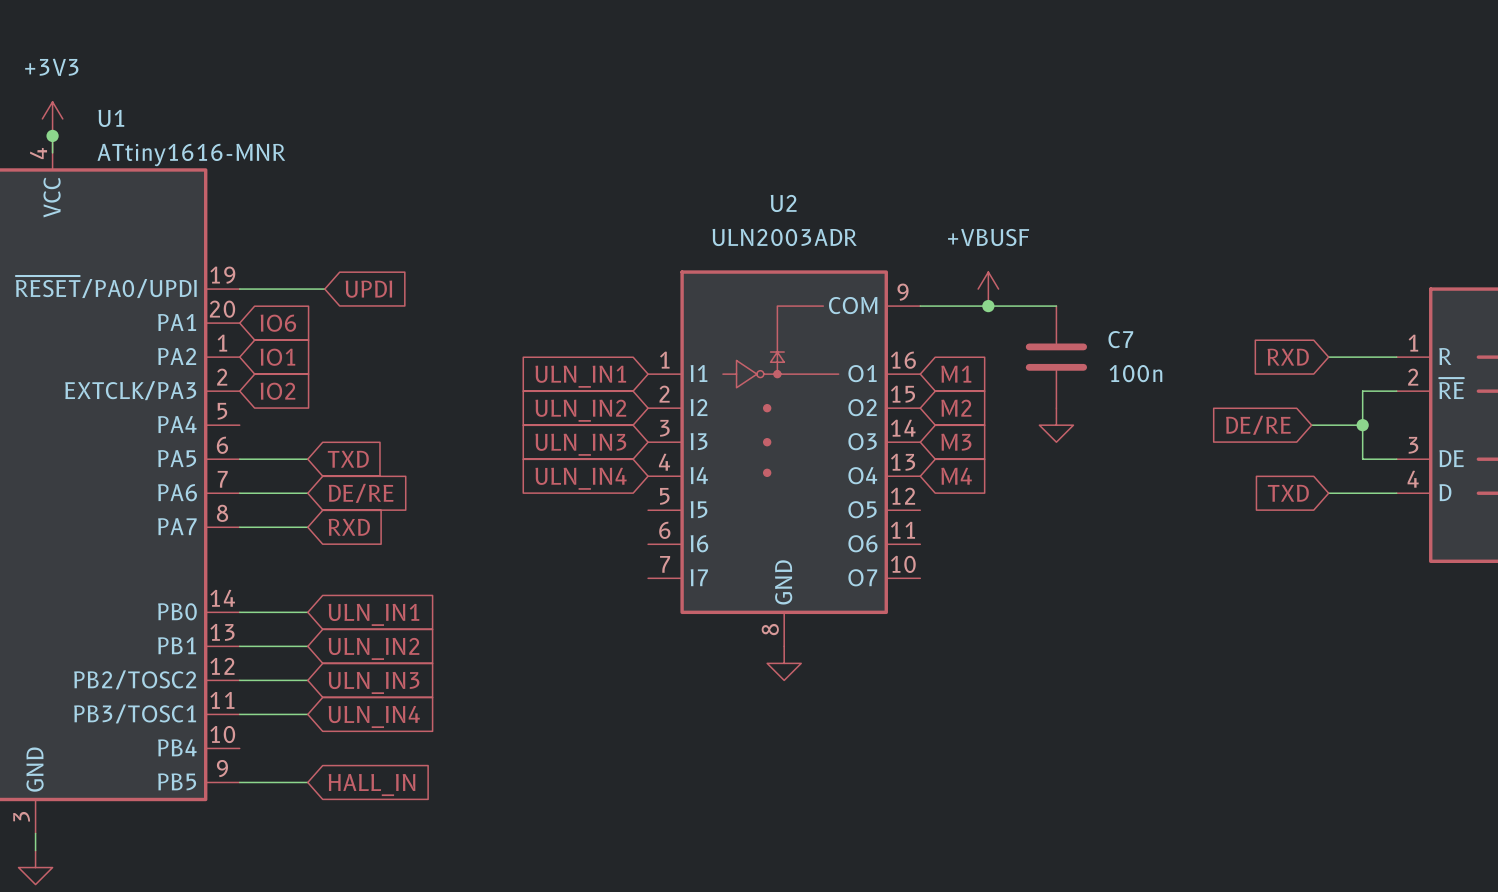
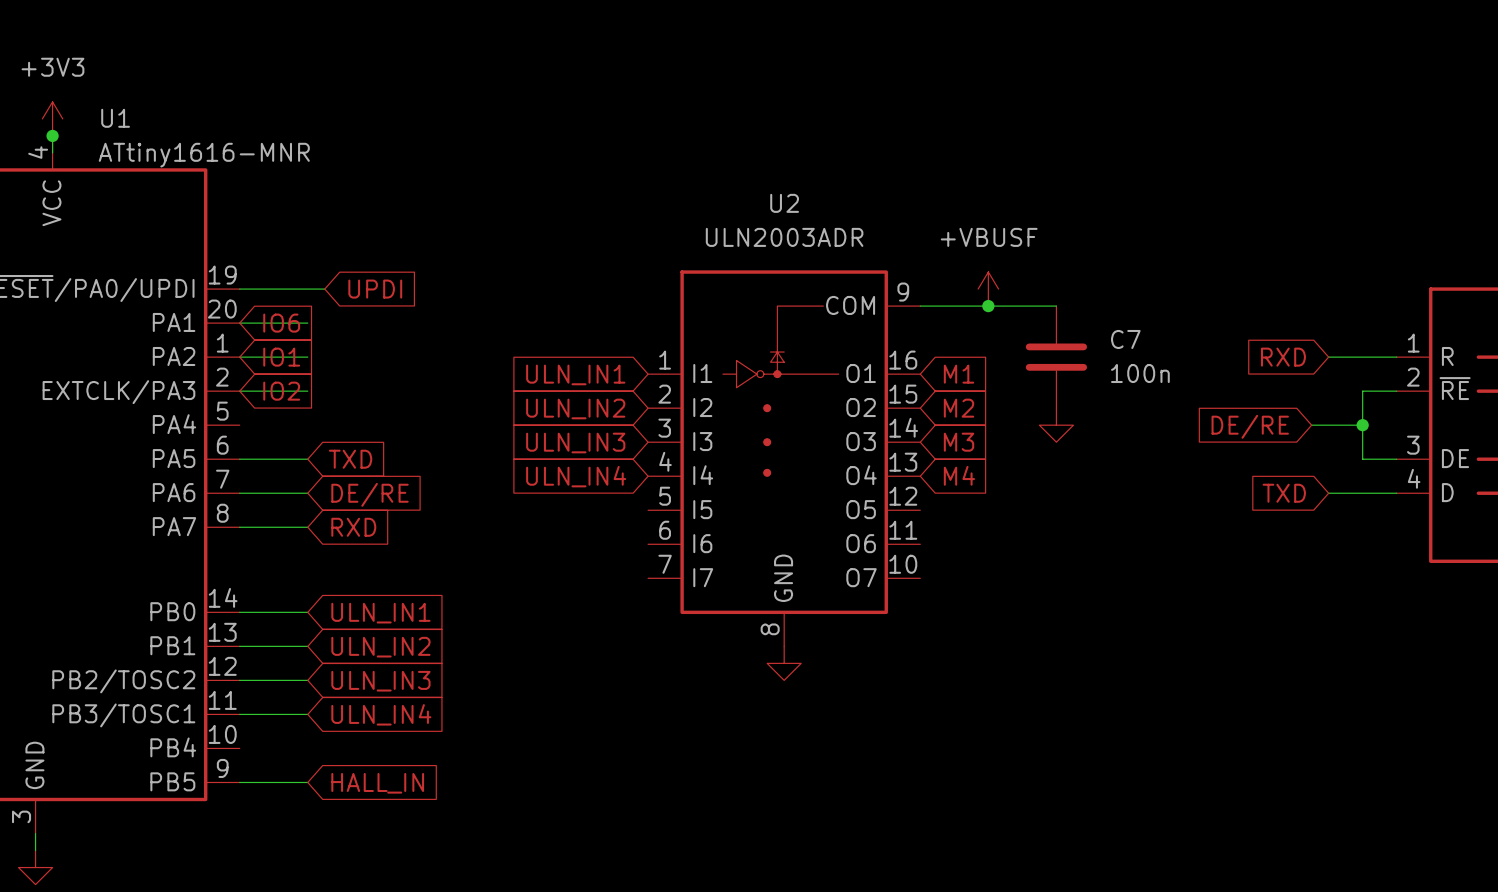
wire: none -> (239, 323) (307, 323)
wire: none -> (239, 357) (307, 357)
wire: none -> (239, 391) (307, 391)

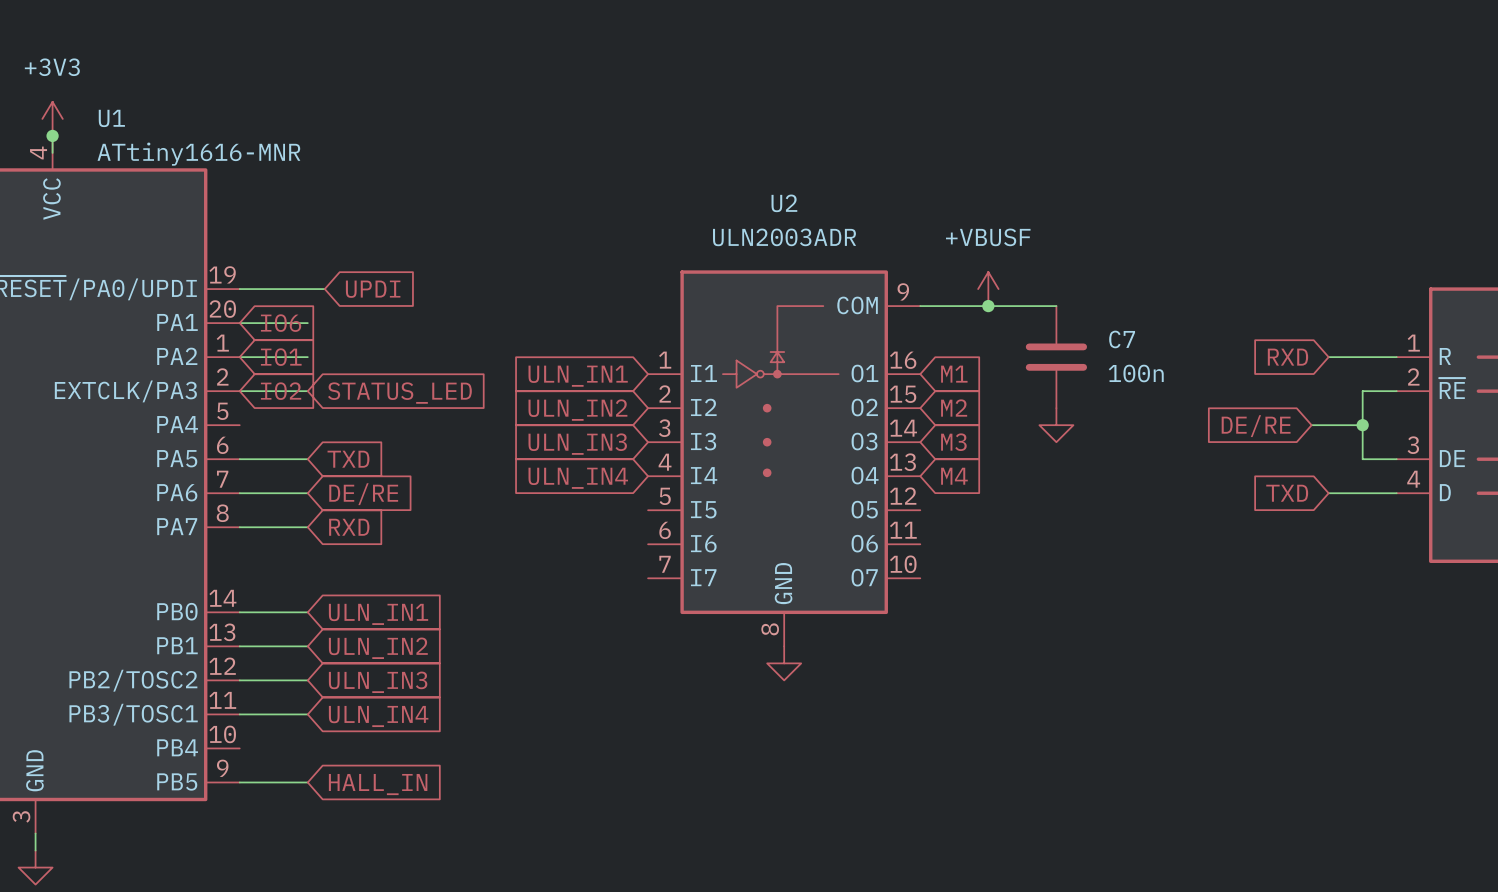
global label: none -> STATUS_LED (399, 393)

